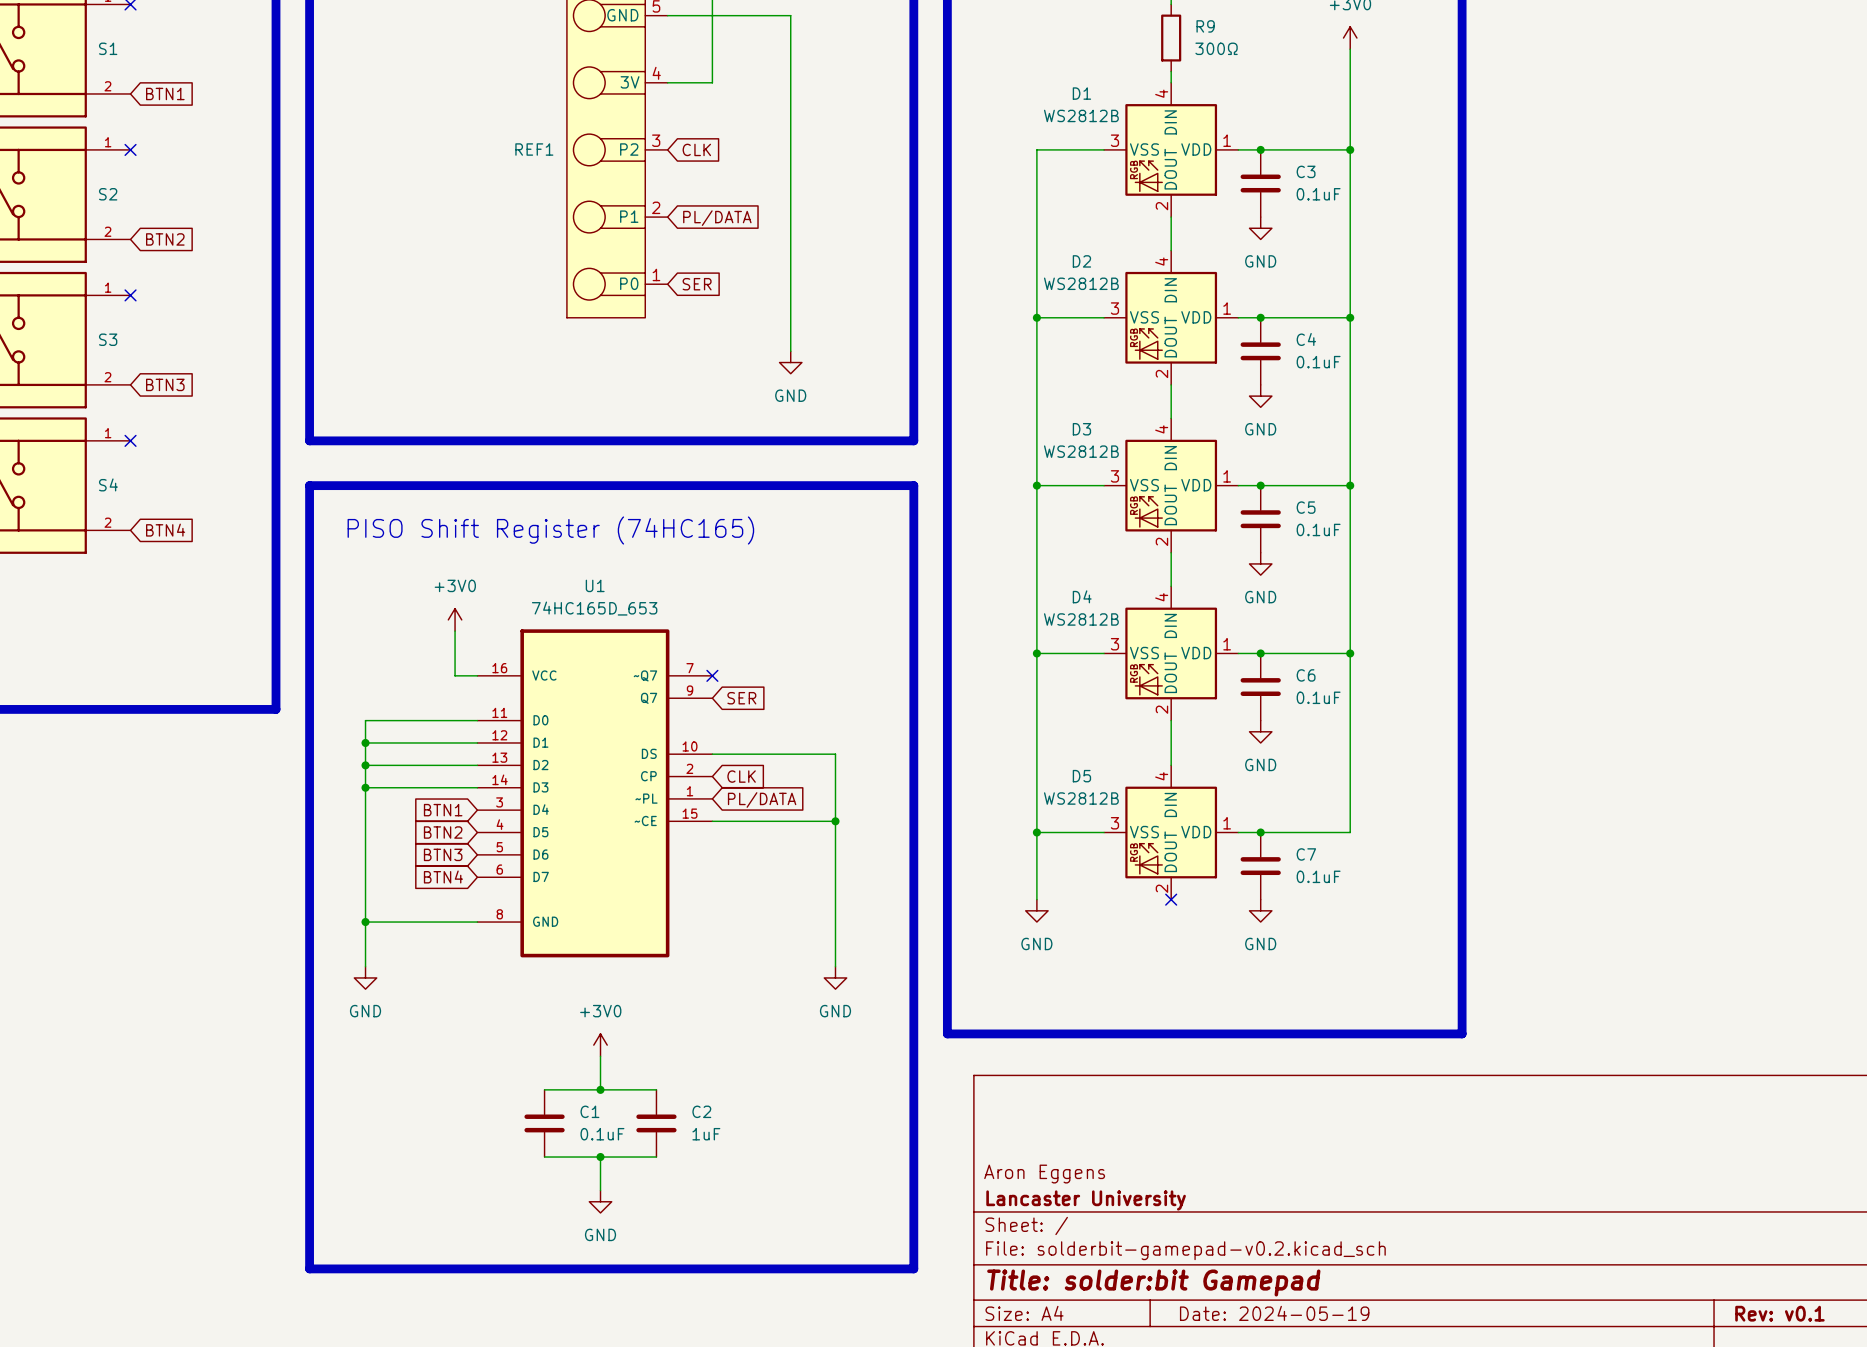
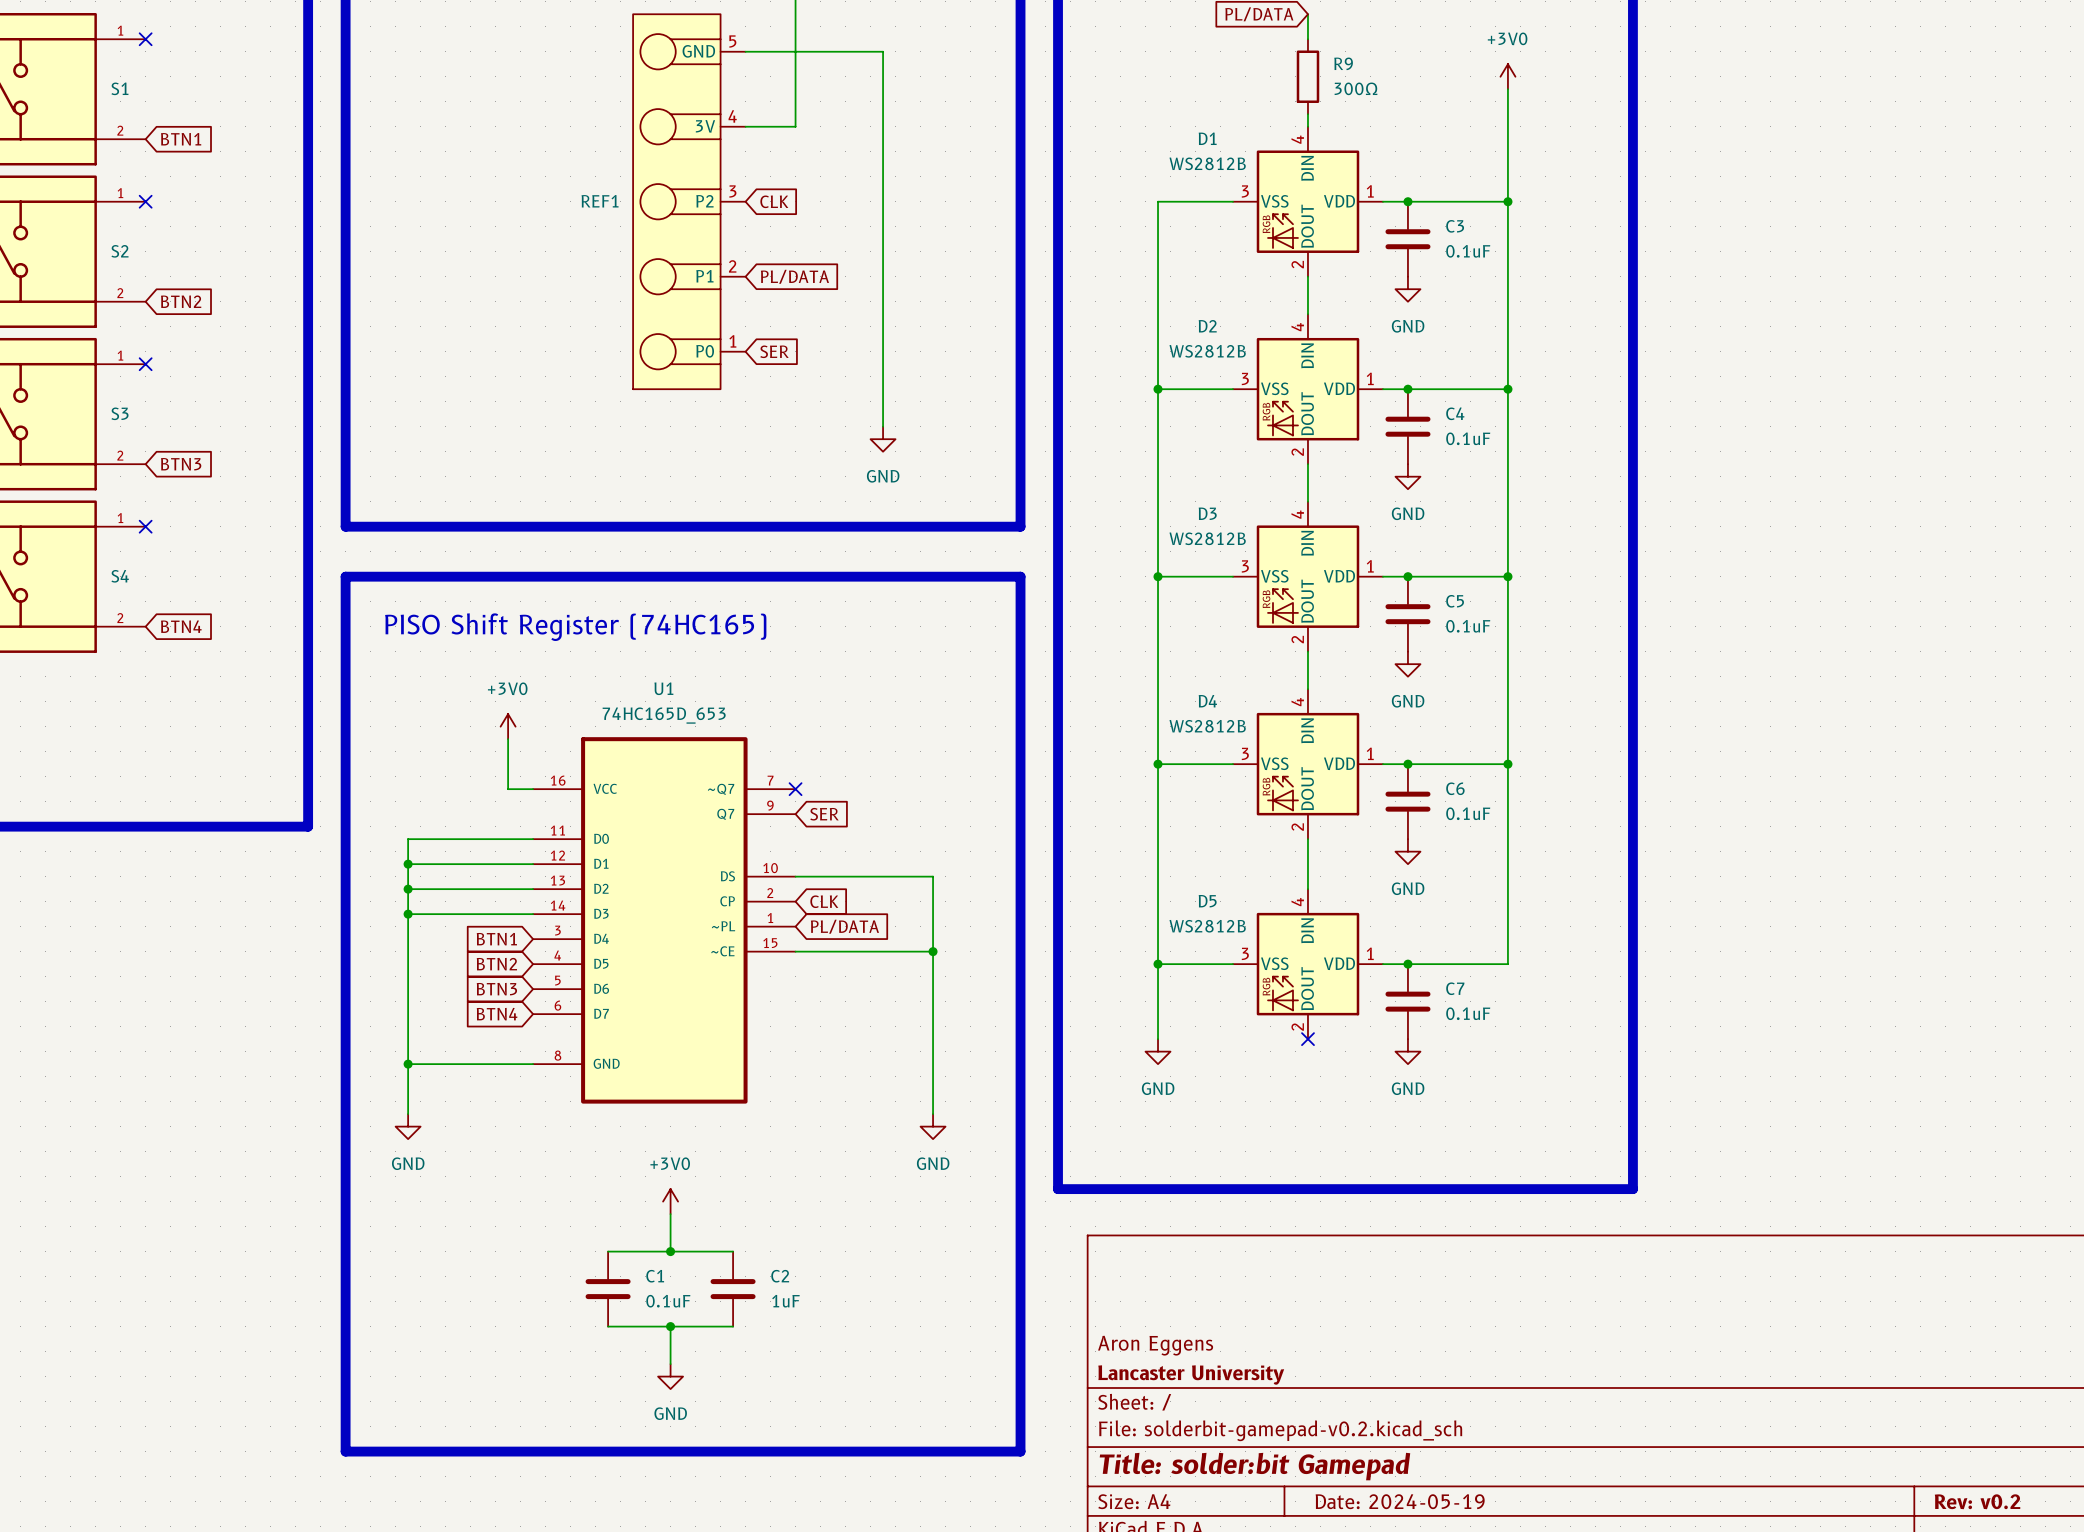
title block: Rev: v0.1 (1779, 1313) -> Rev: v0.2 (1977, 1501)

